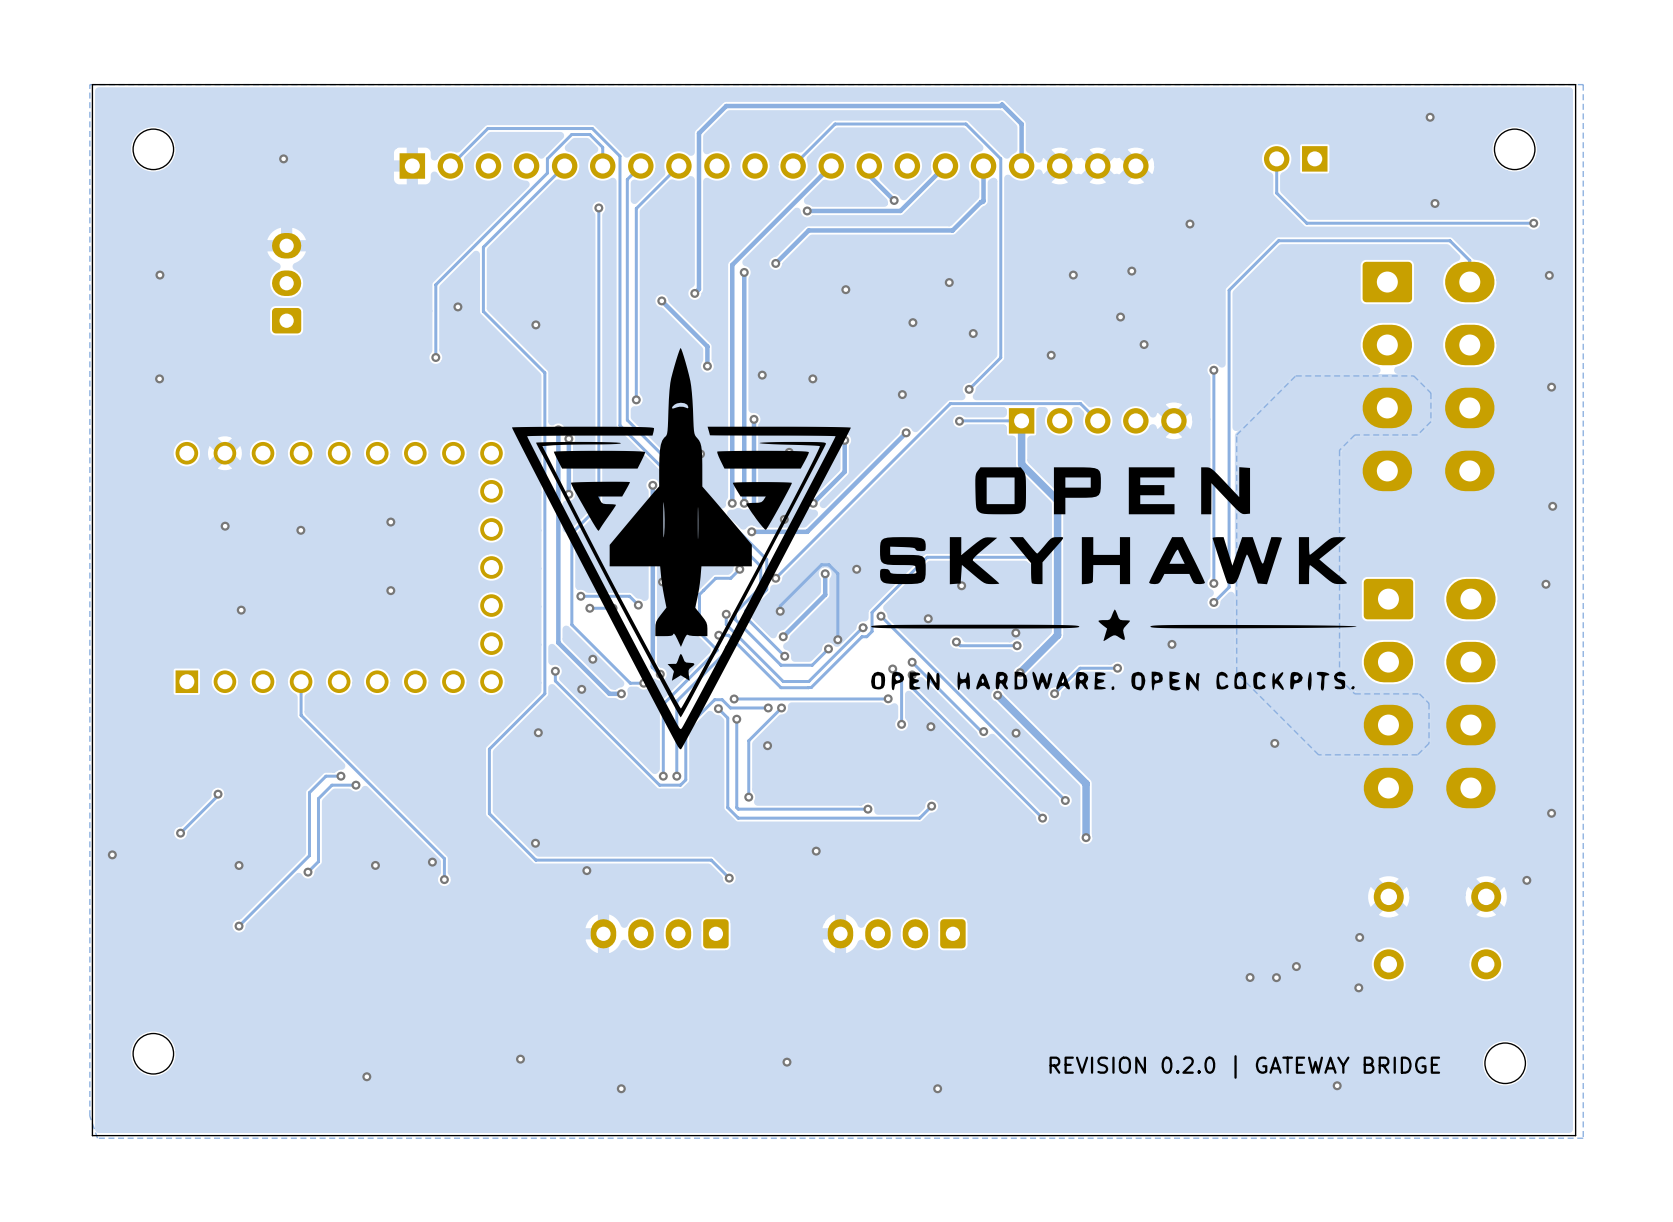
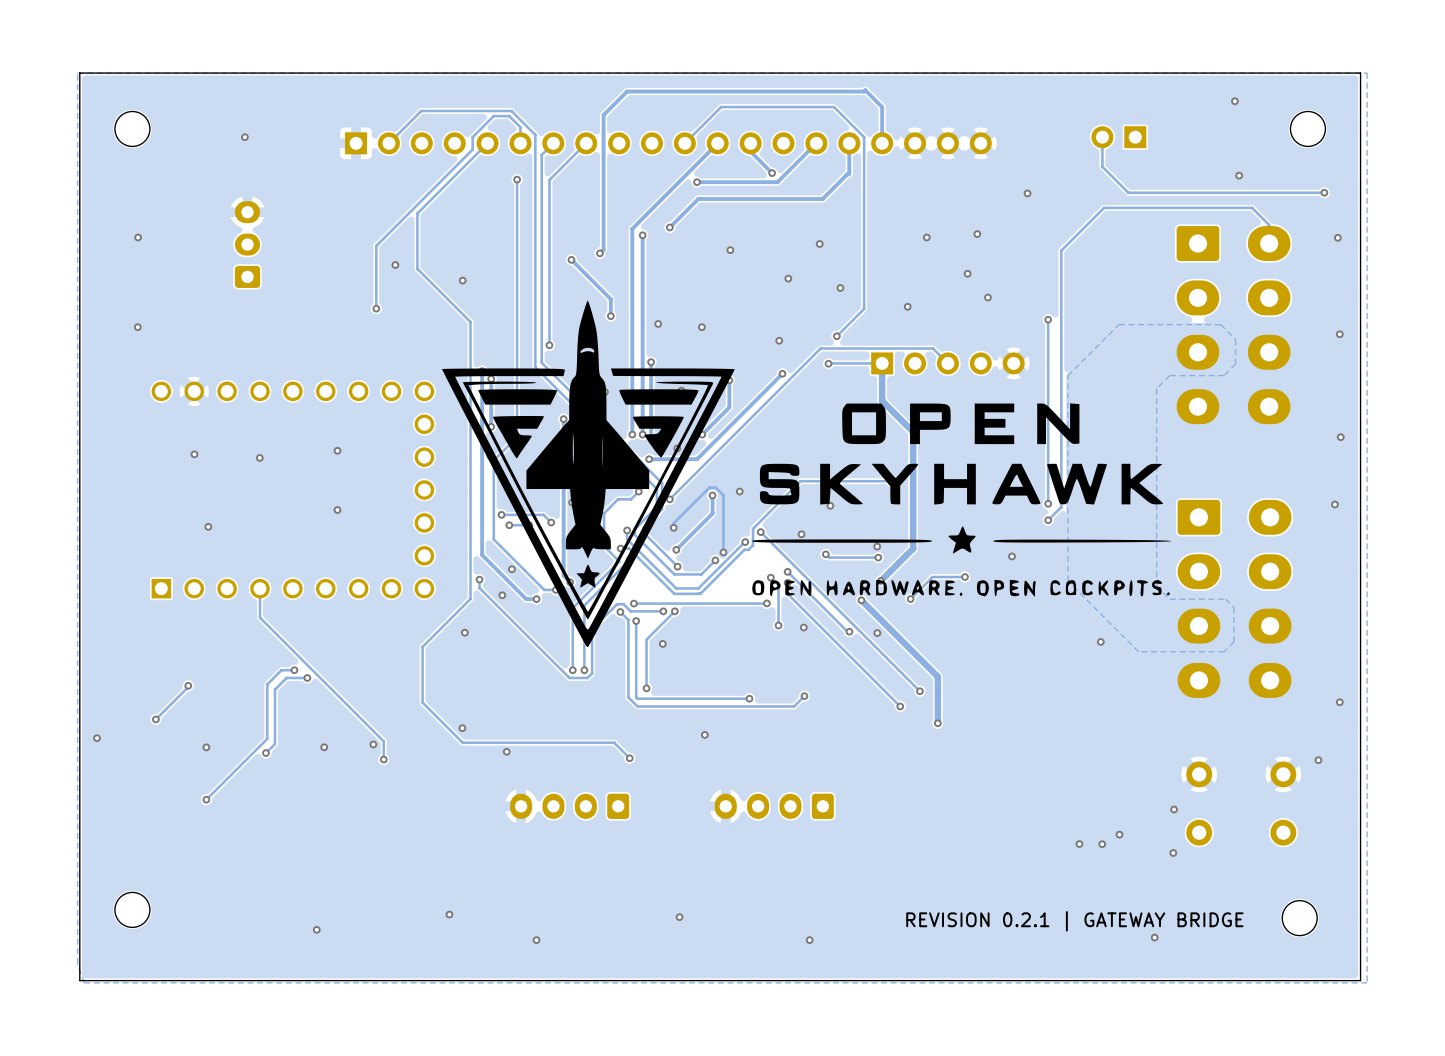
text: REVISION 0.2.0 | GATEWAY BRIDGE (1244, 1066) -> REVISION 0.2.1 | GATEWAY BRIDGE (1074, 921)

